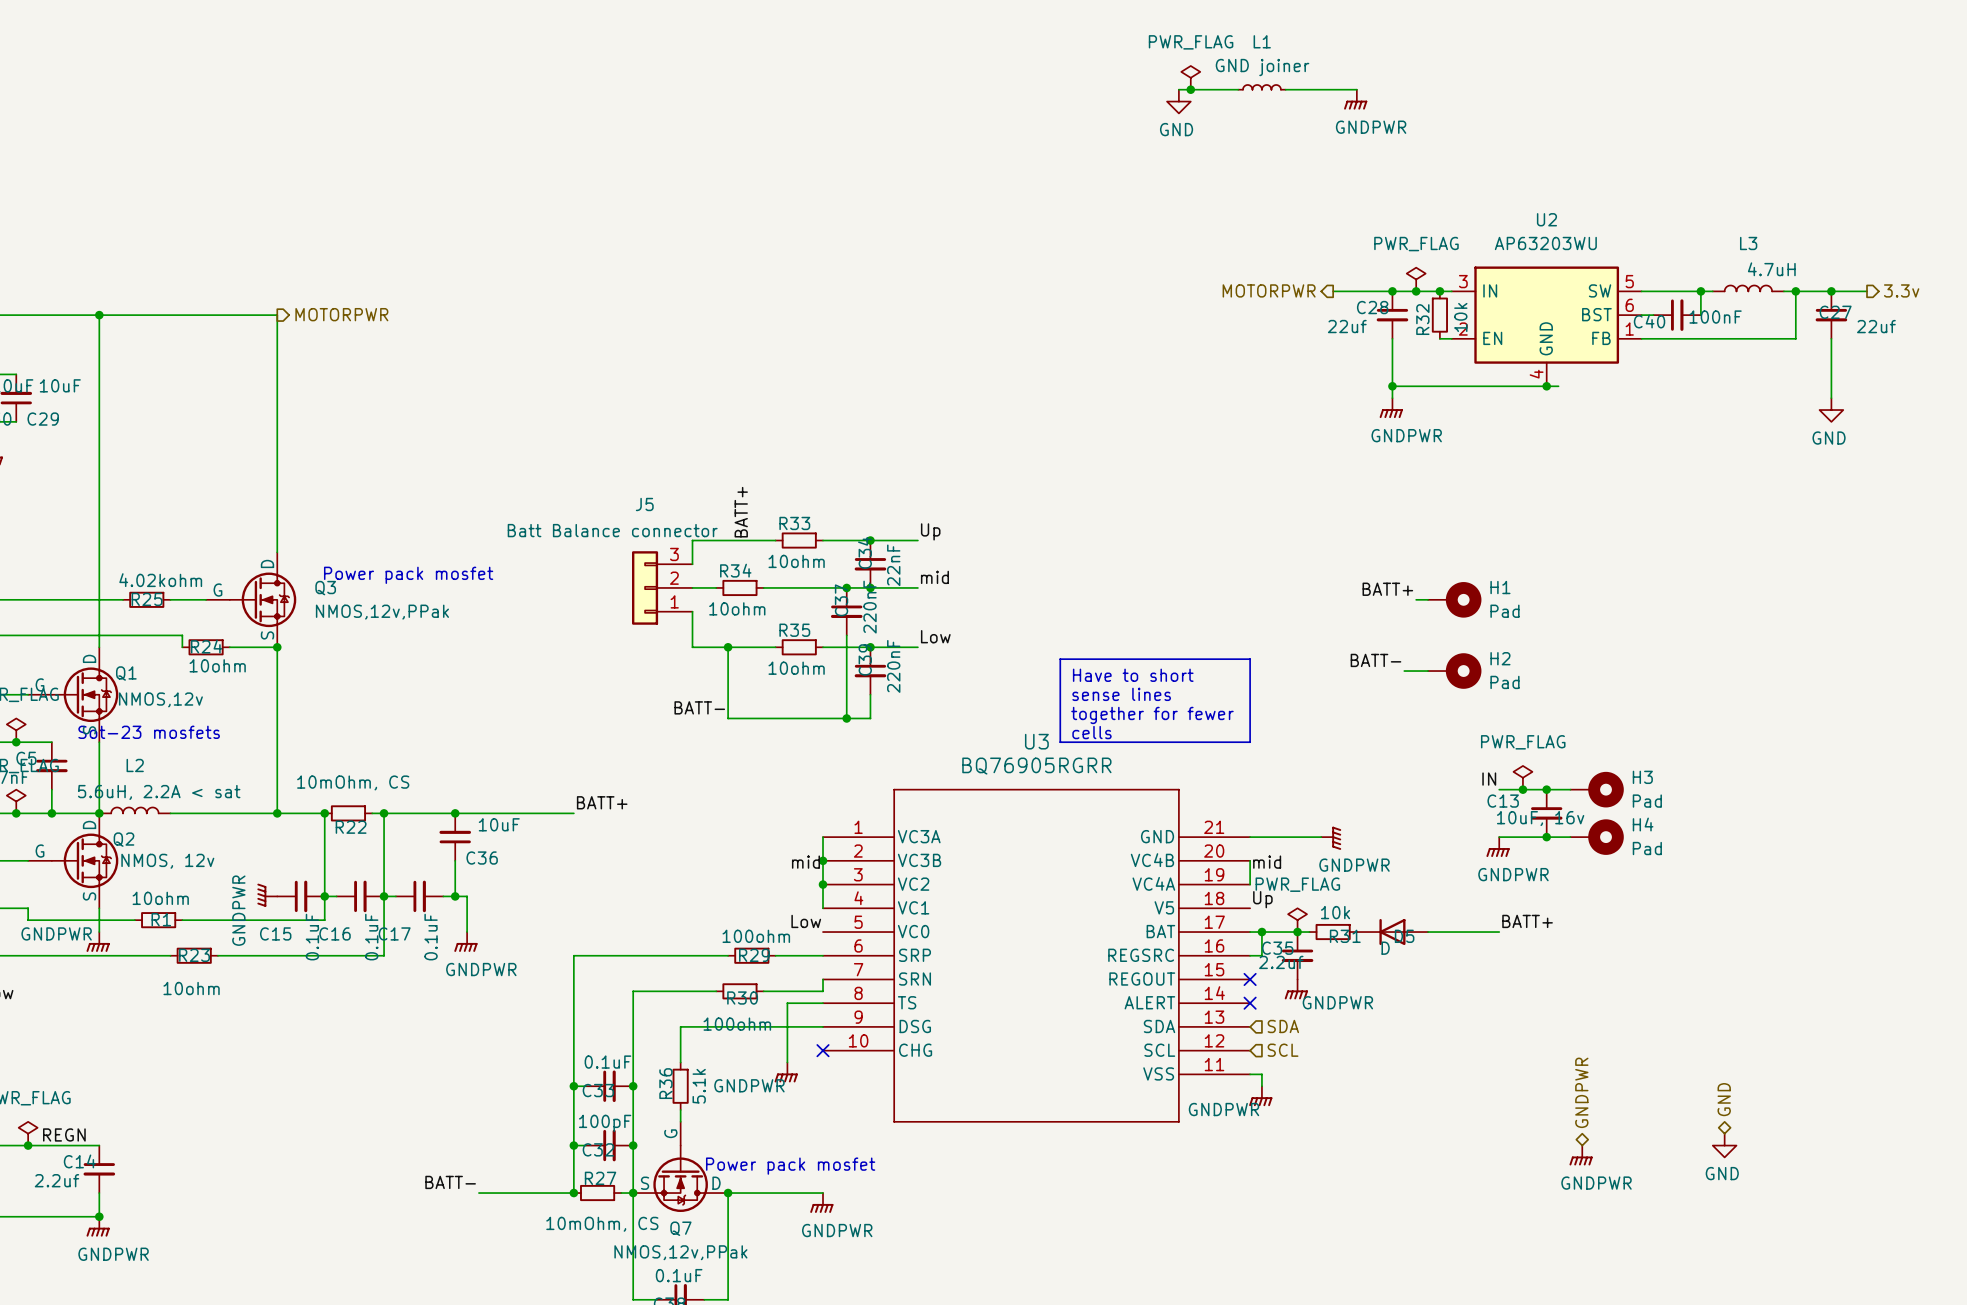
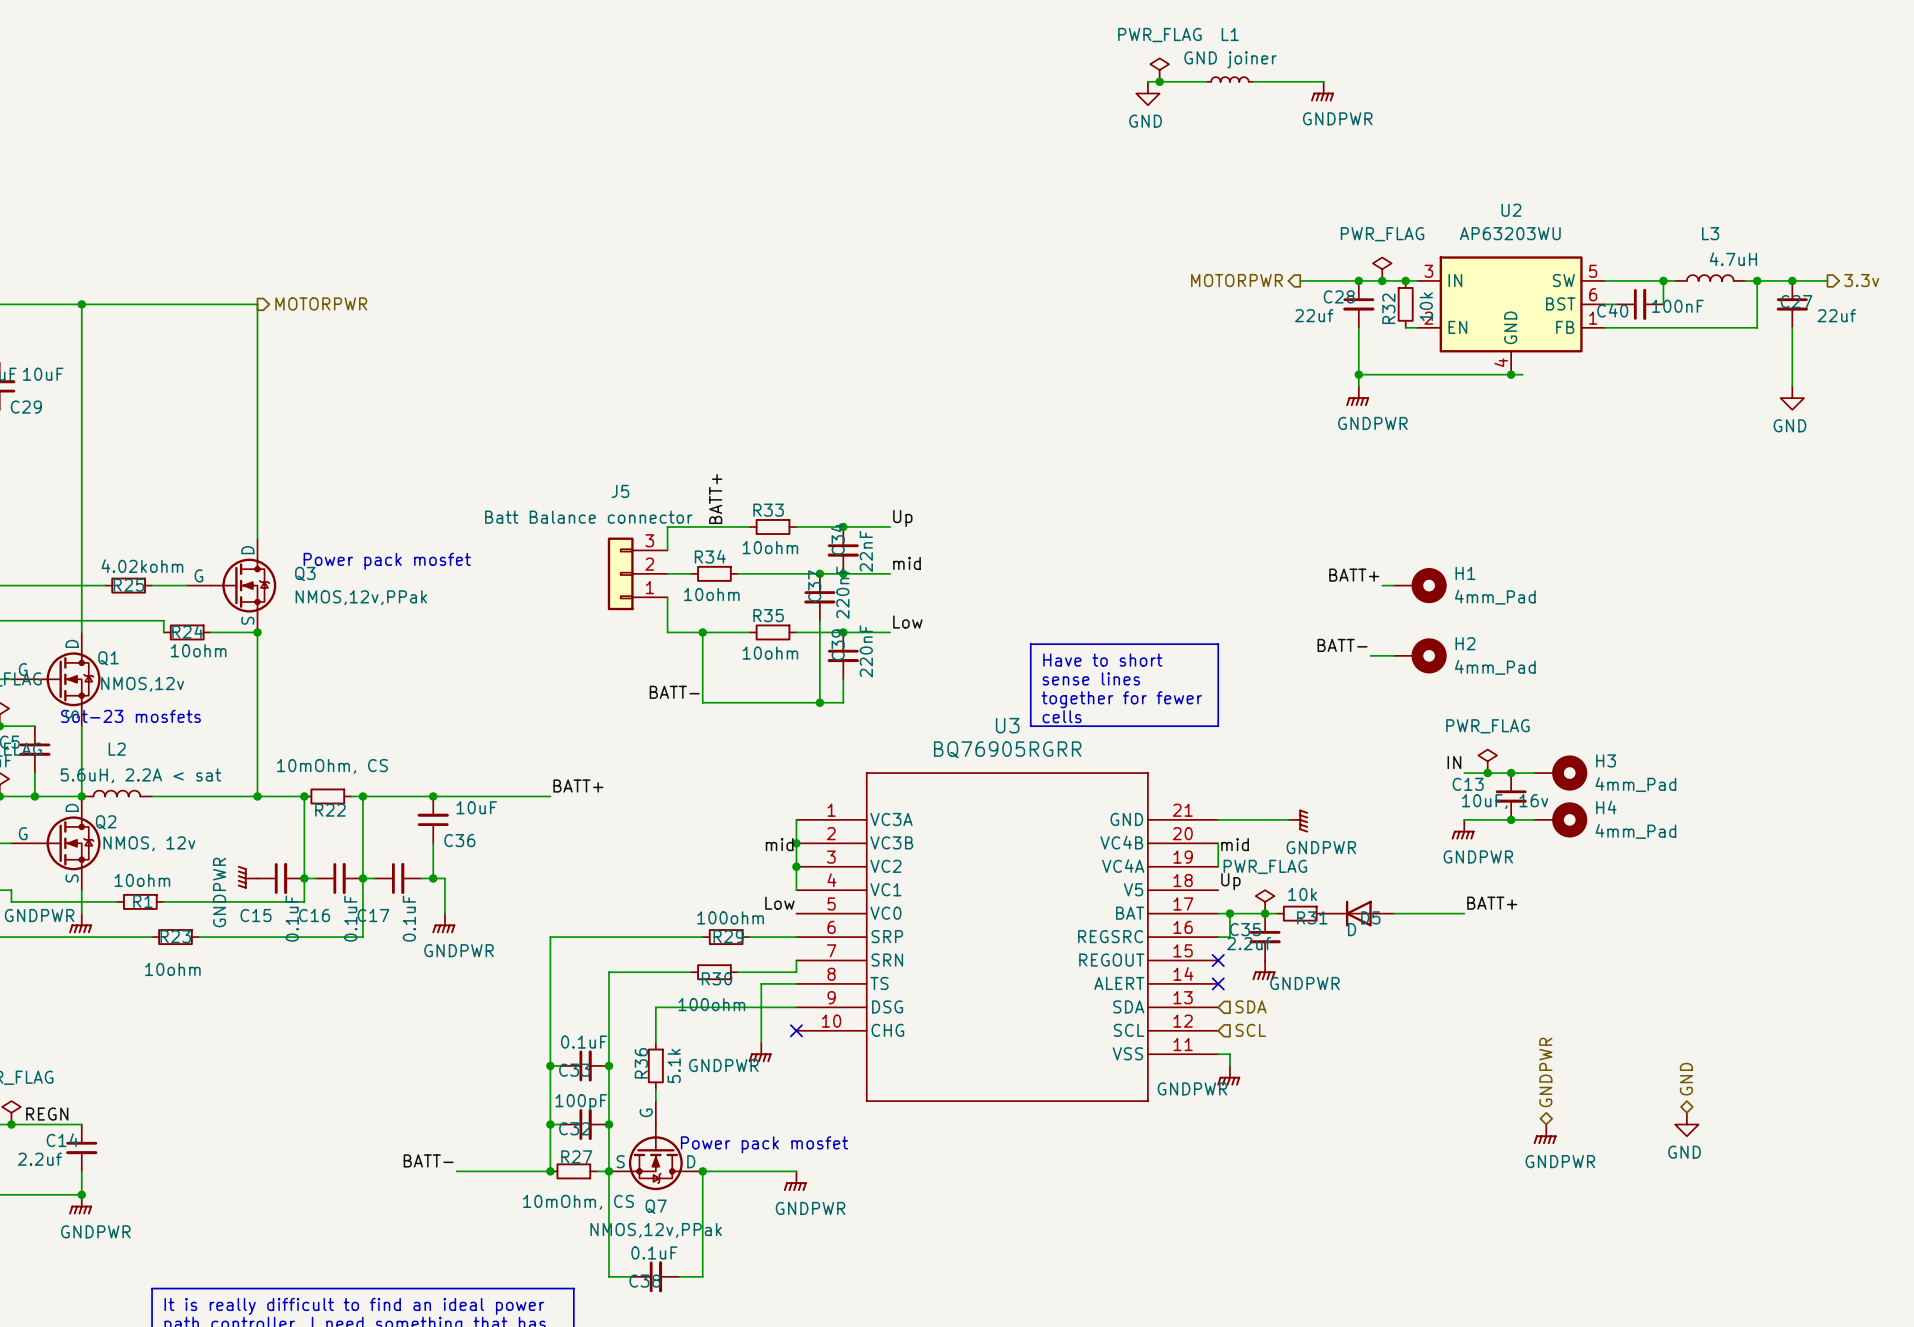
H1 value: Pad (1504, 611) -> 4mm_Pad (1495, 597)
H2 value: Pad (1504, 682) -> 4mm_Pad (1495, 667)
H3 value: Pad (1647, 801) -> 4mm_Pad (1635, 784)
H4 value: Pad (1647, 848) -> 4mm_Pad (1635, 831)

